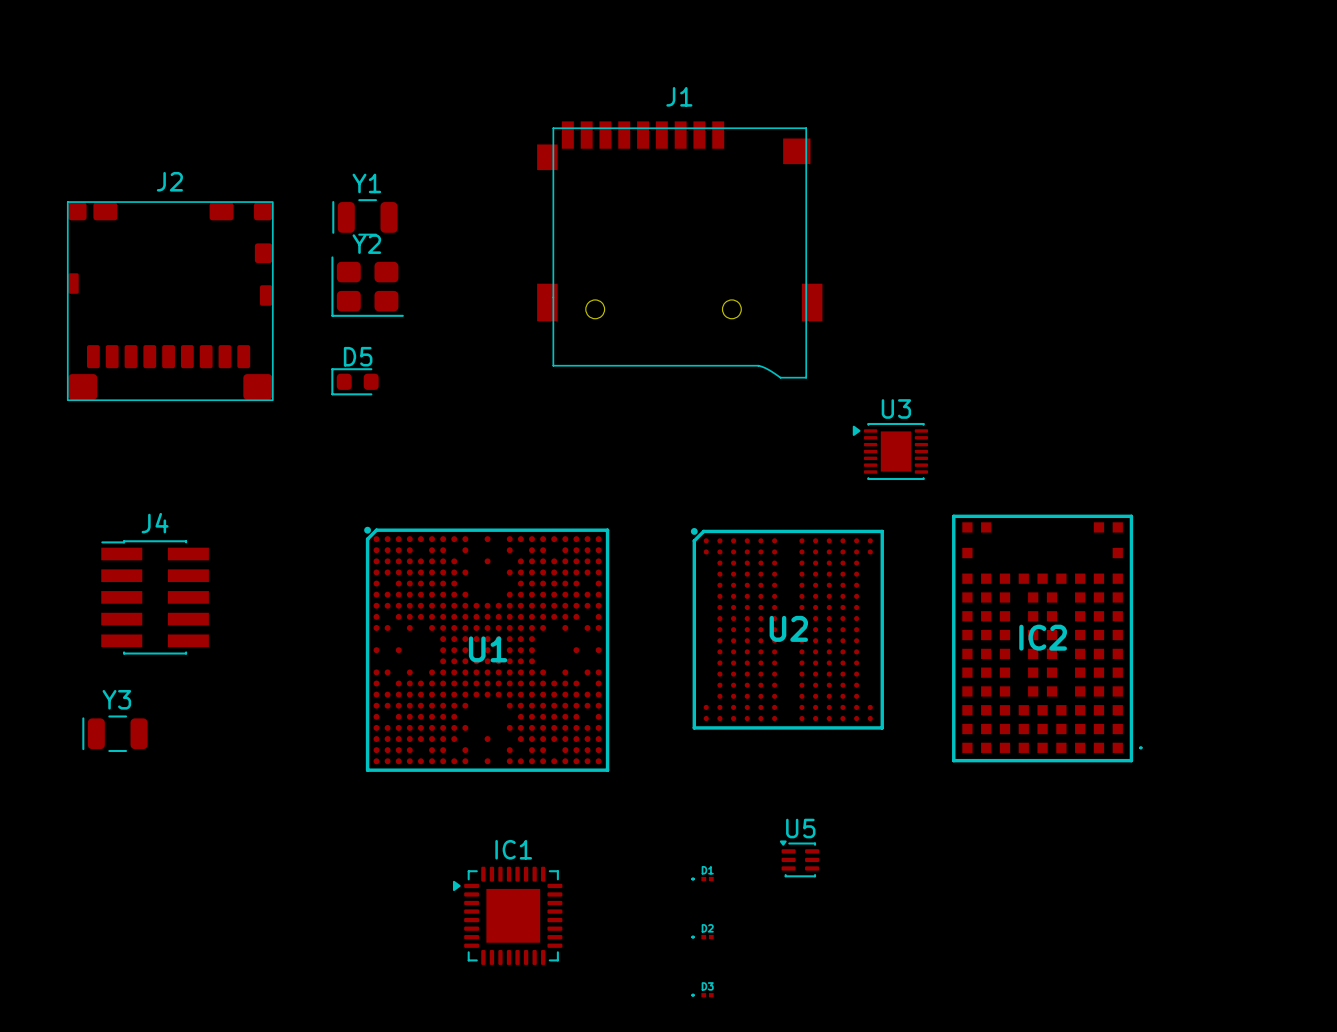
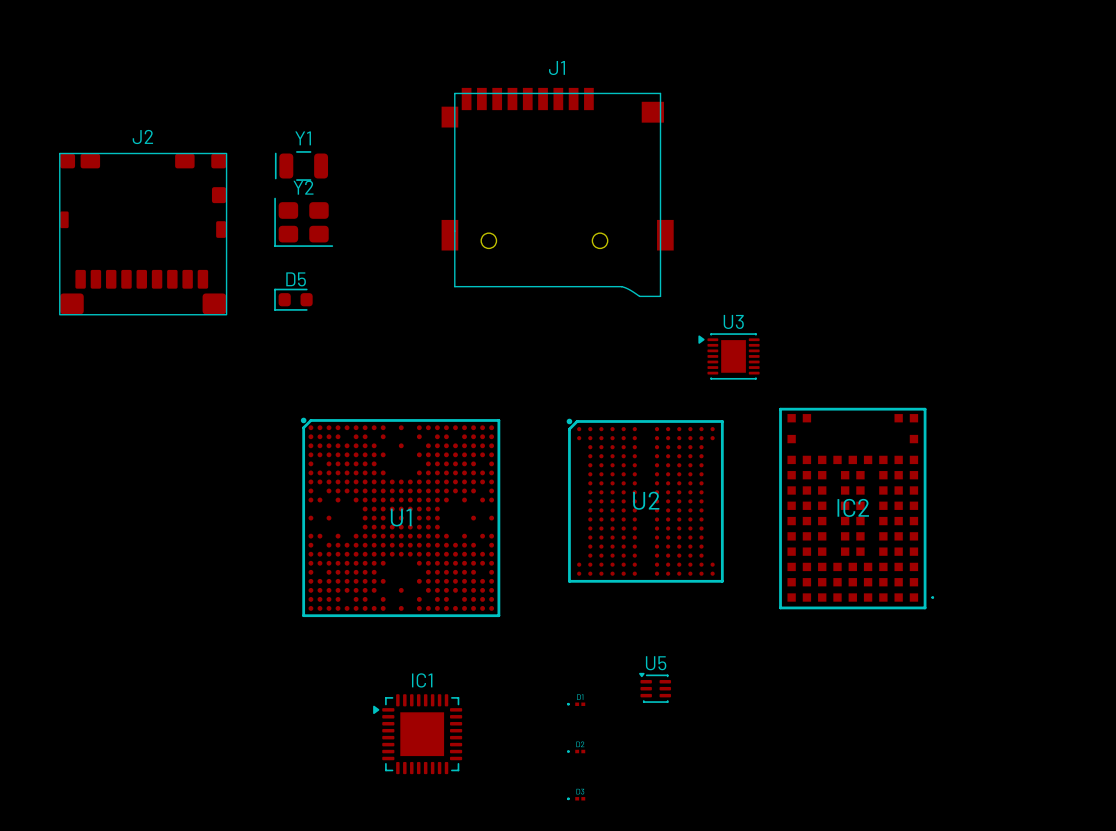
J4: (155, 597) -> none
Y3: (114, 733) -> none

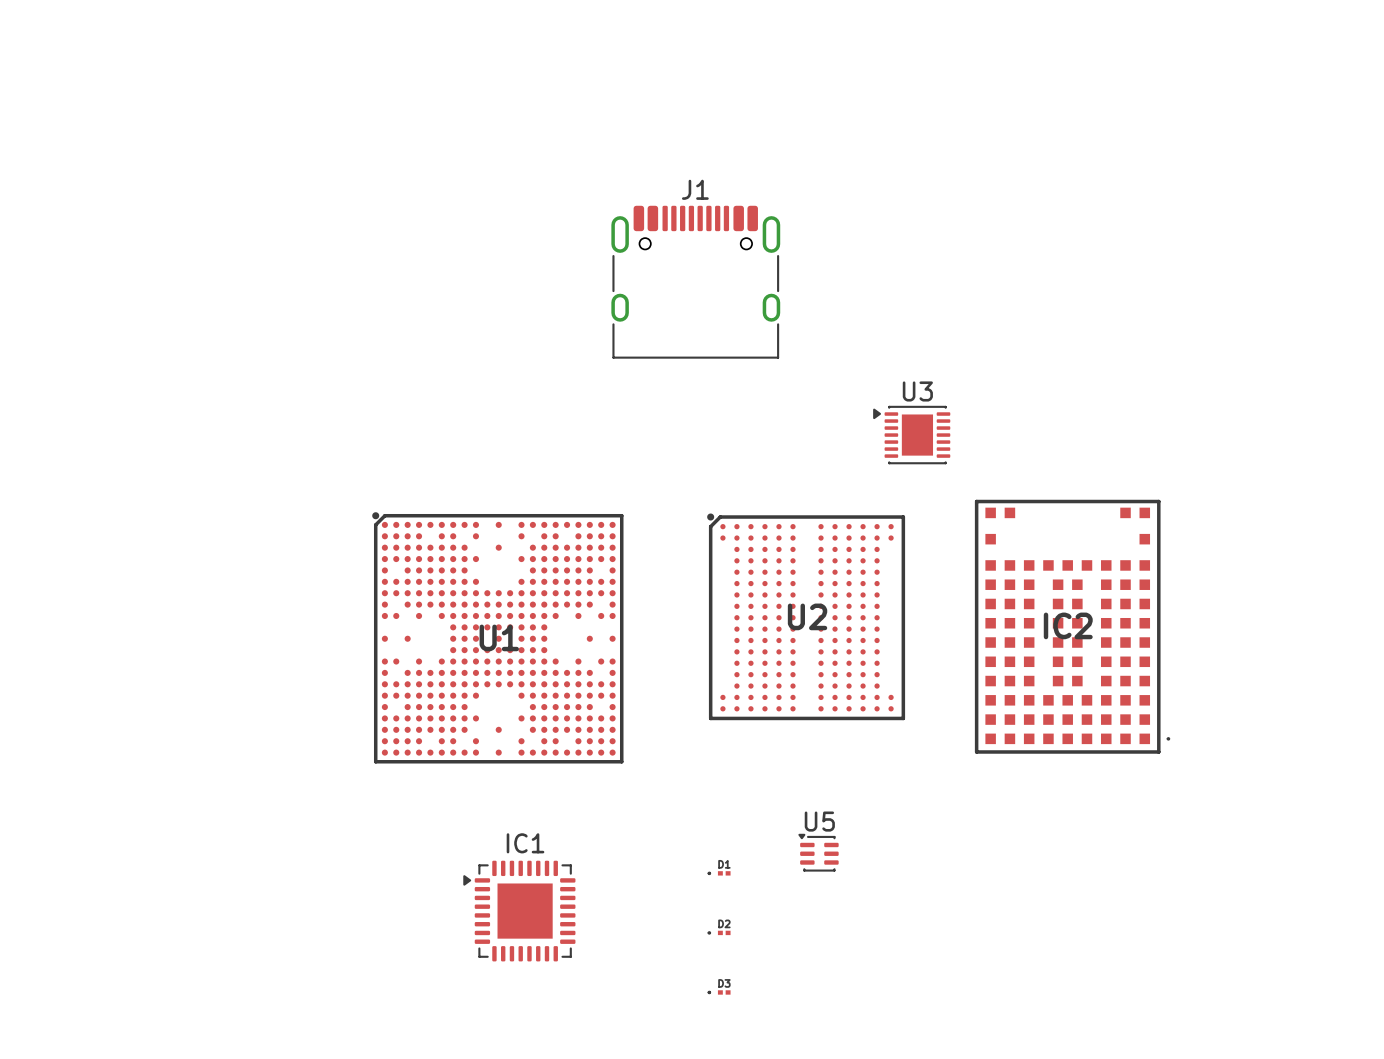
J1 name position: J1 (557, 67) -> J1 (695, 189)
J1 footprint: [441, 87, 674, 298] -> [611, 205, 781, 359]
Y1: (301, 166) -> none
Y2: (303, 222) -> none
J2: (143, 234) -> none
D5: (293, 299) -> none

